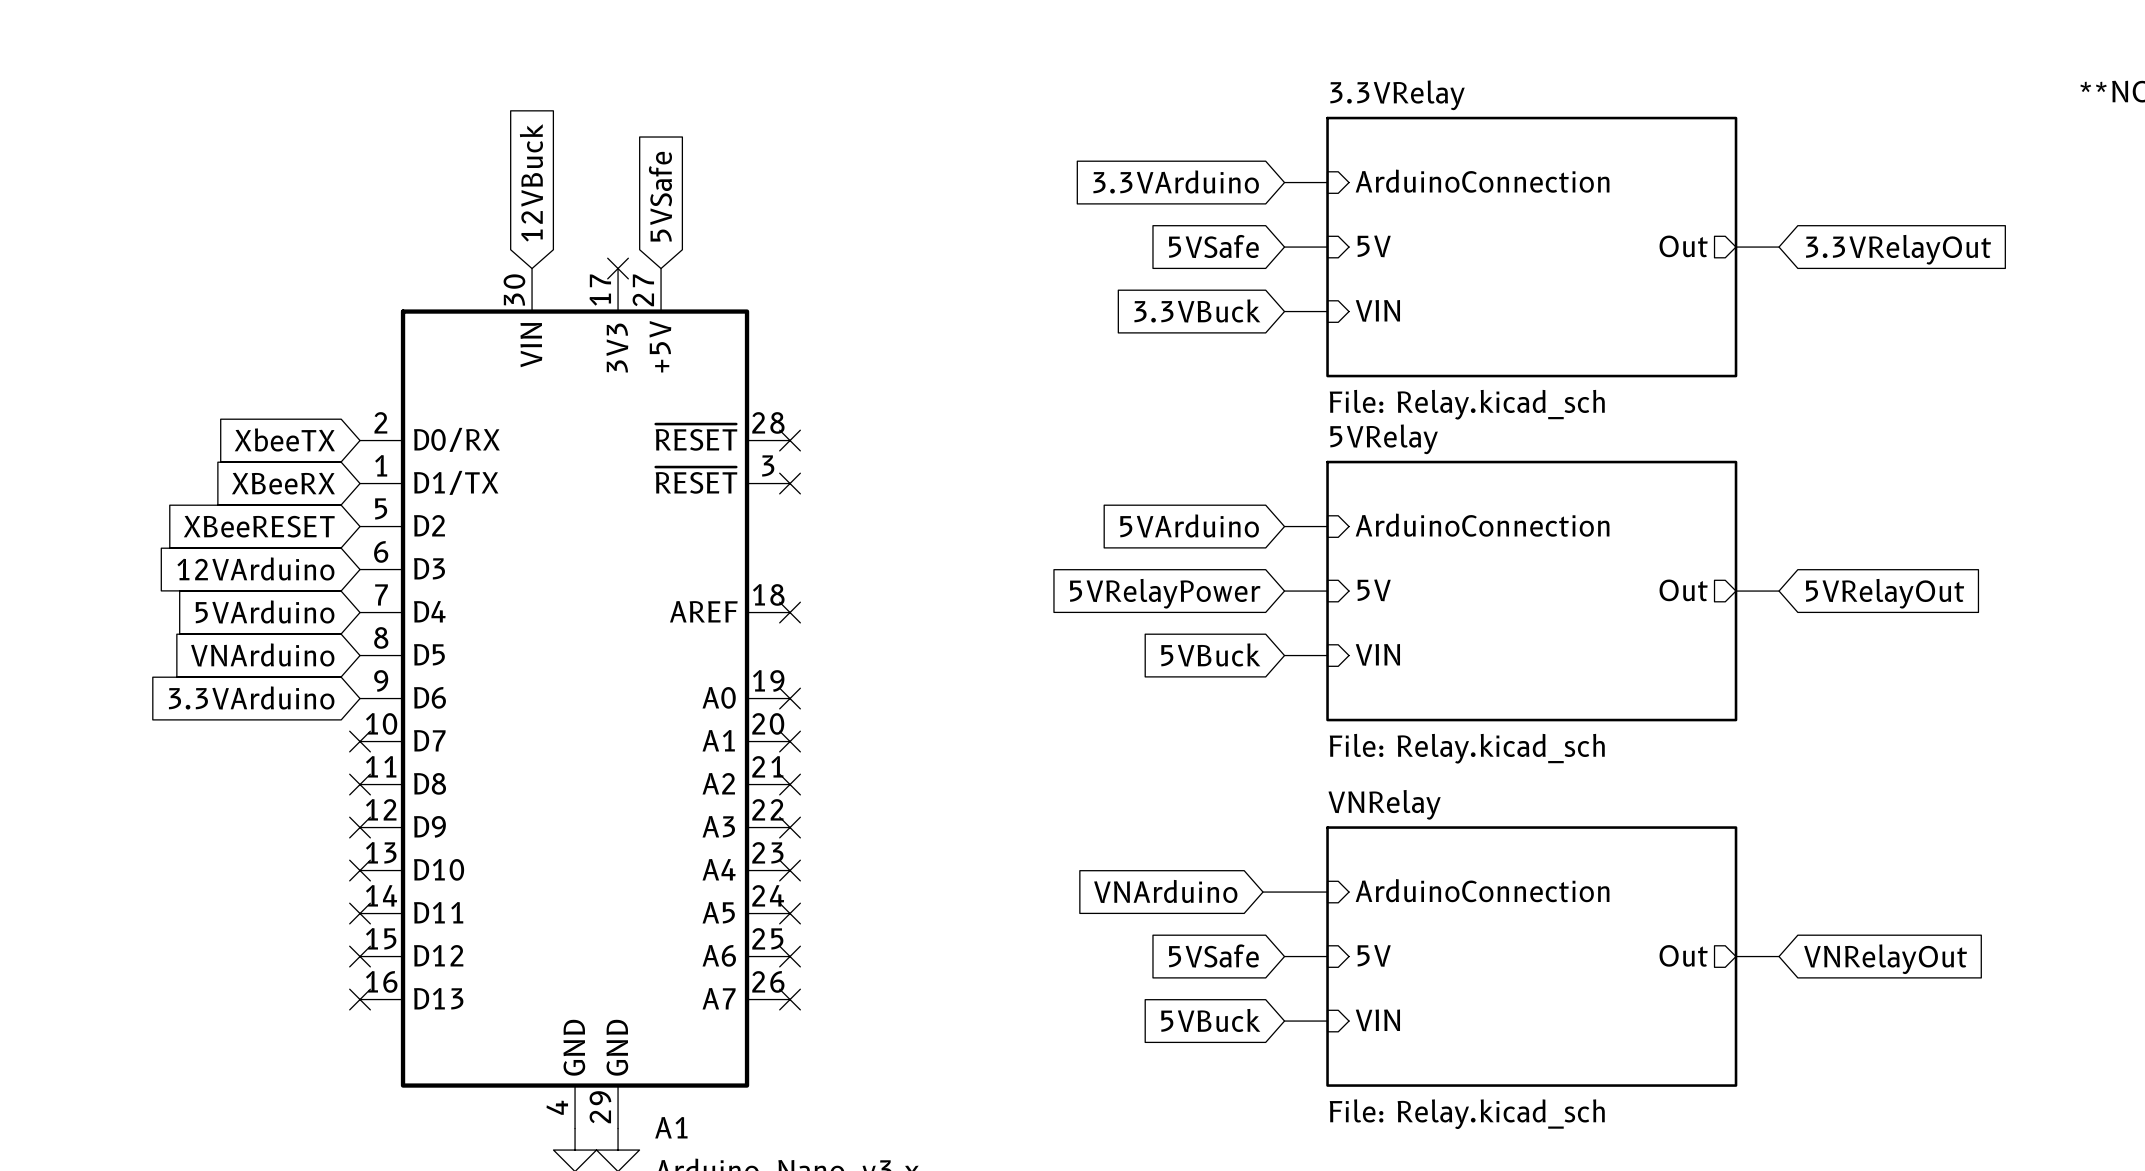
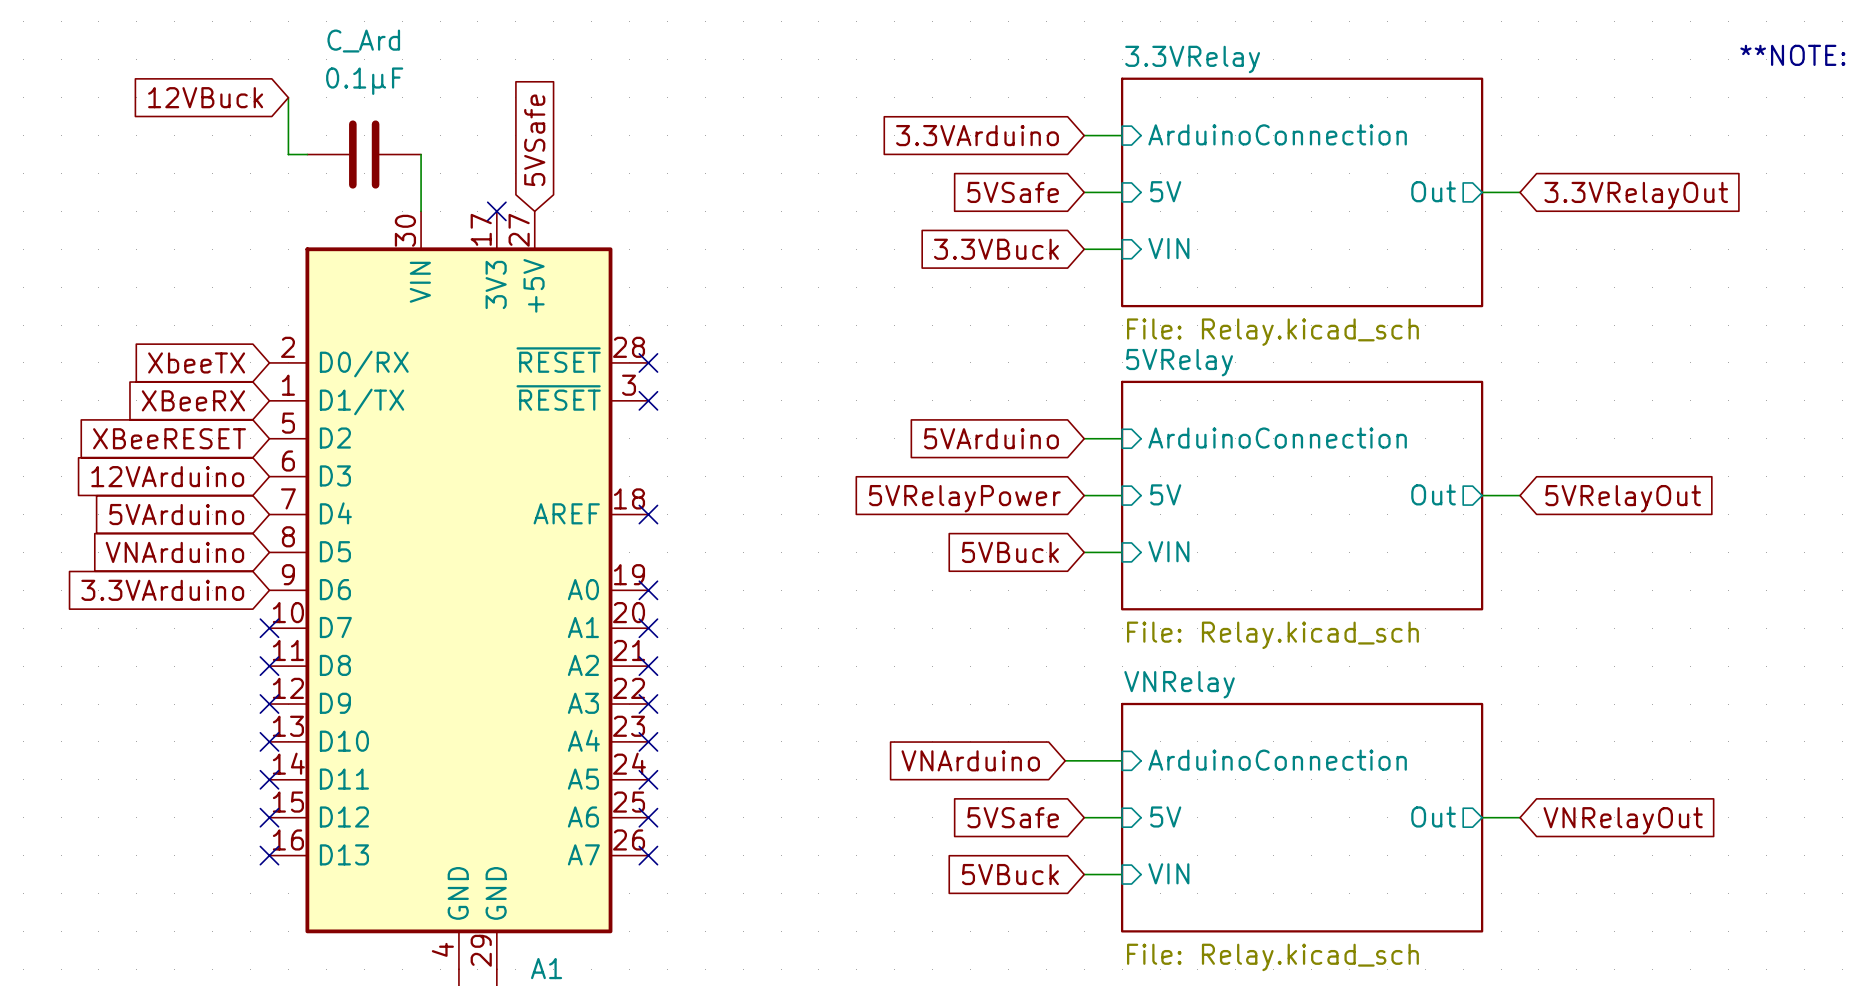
wire: none -> (288, 97) (288, 154) (307, 154)
global label rotation: 0° (531, 182) -> 90° counterclockwise (205, 97)
global label position: 12VBuck (531, 182) -> 12VBuck (205, 97)
C_Ard: none -> 0.1µF (364, 154)
wire: none -> (421, 154) (421, 211)

